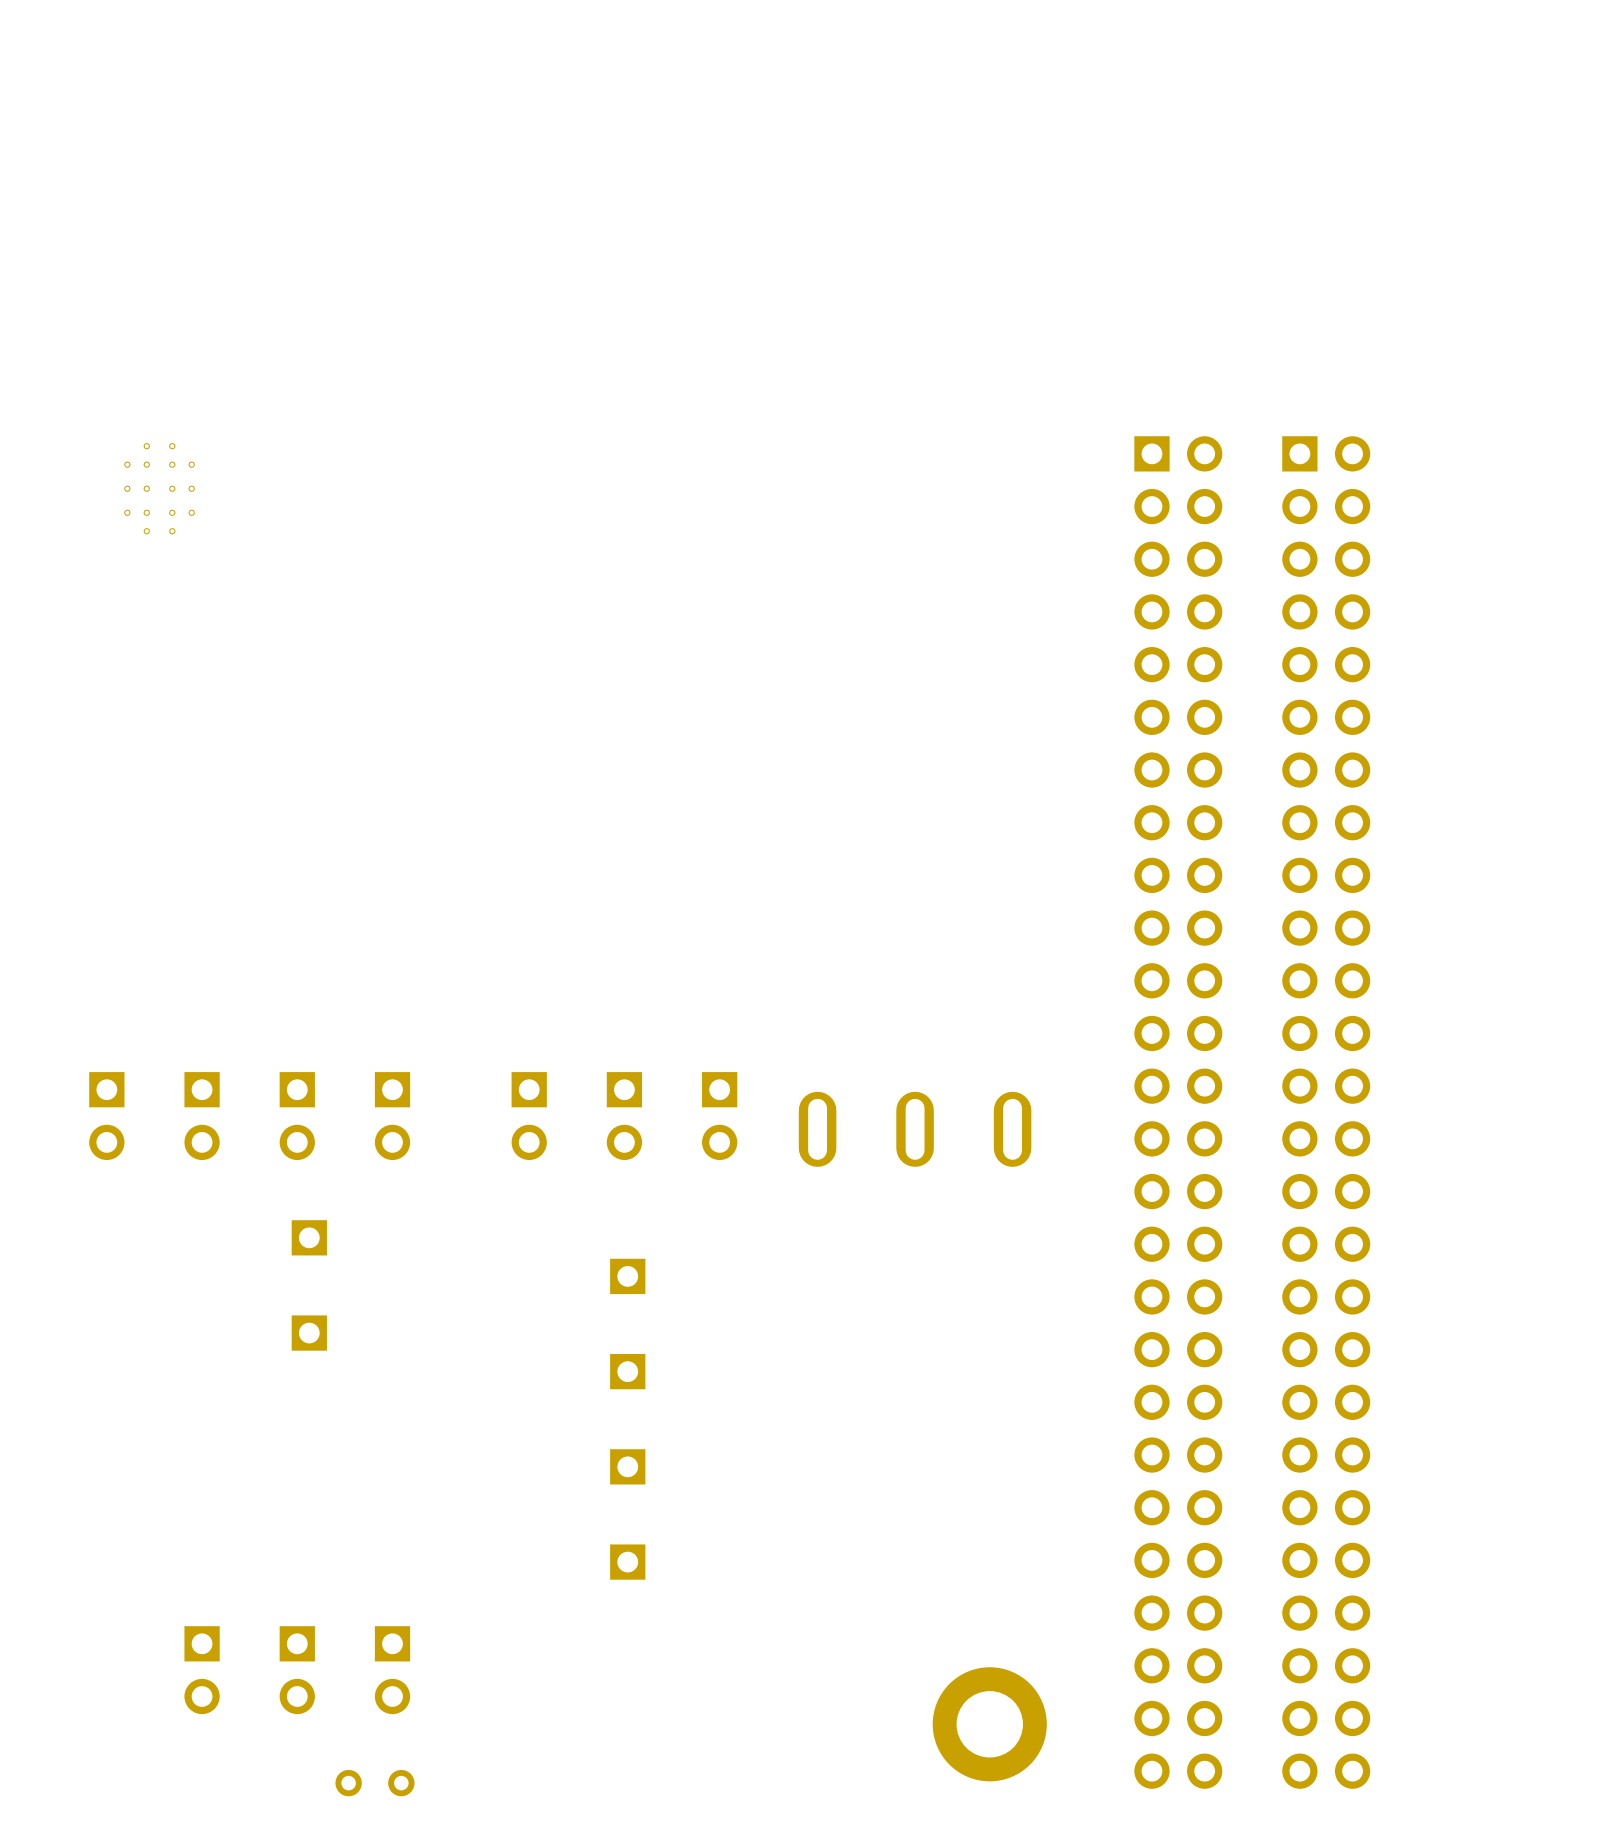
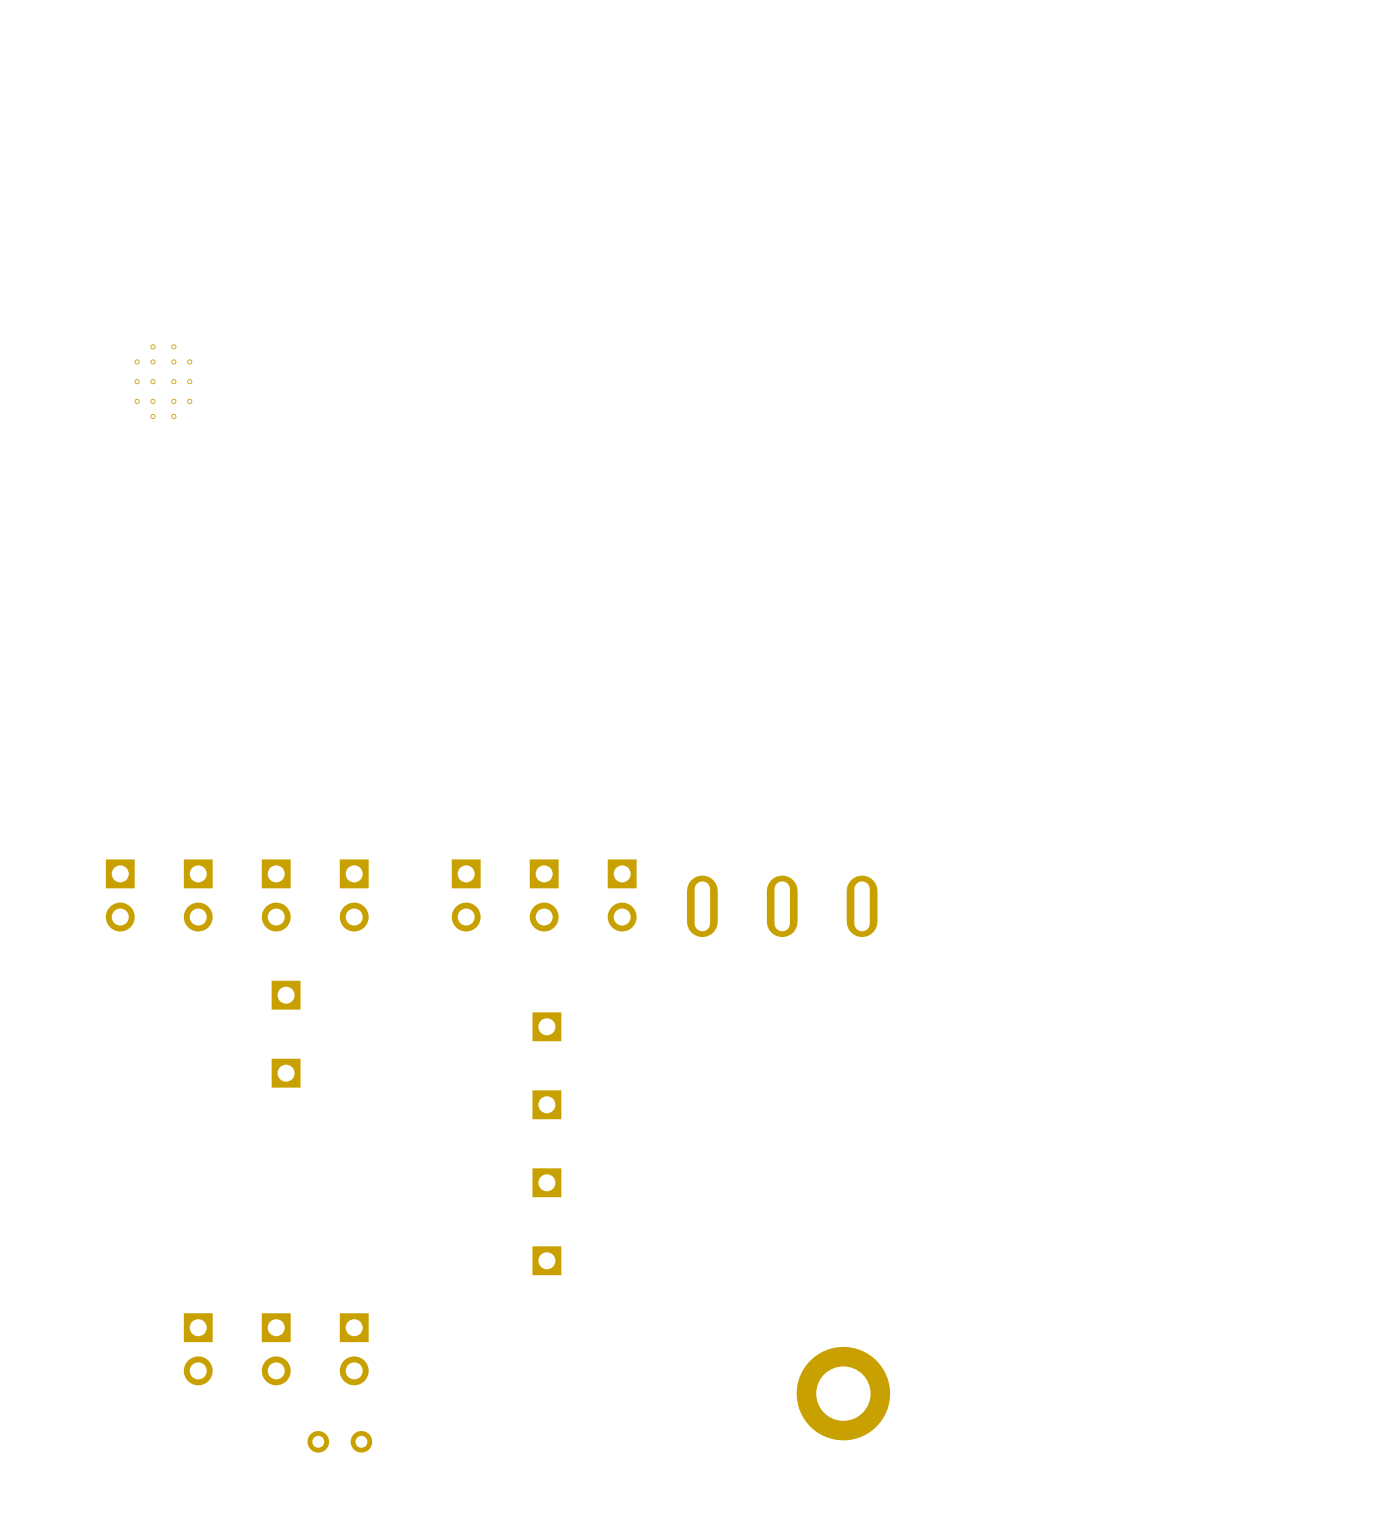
part: (1178, 1112) -> none
part: (1326, 1112) -> none

